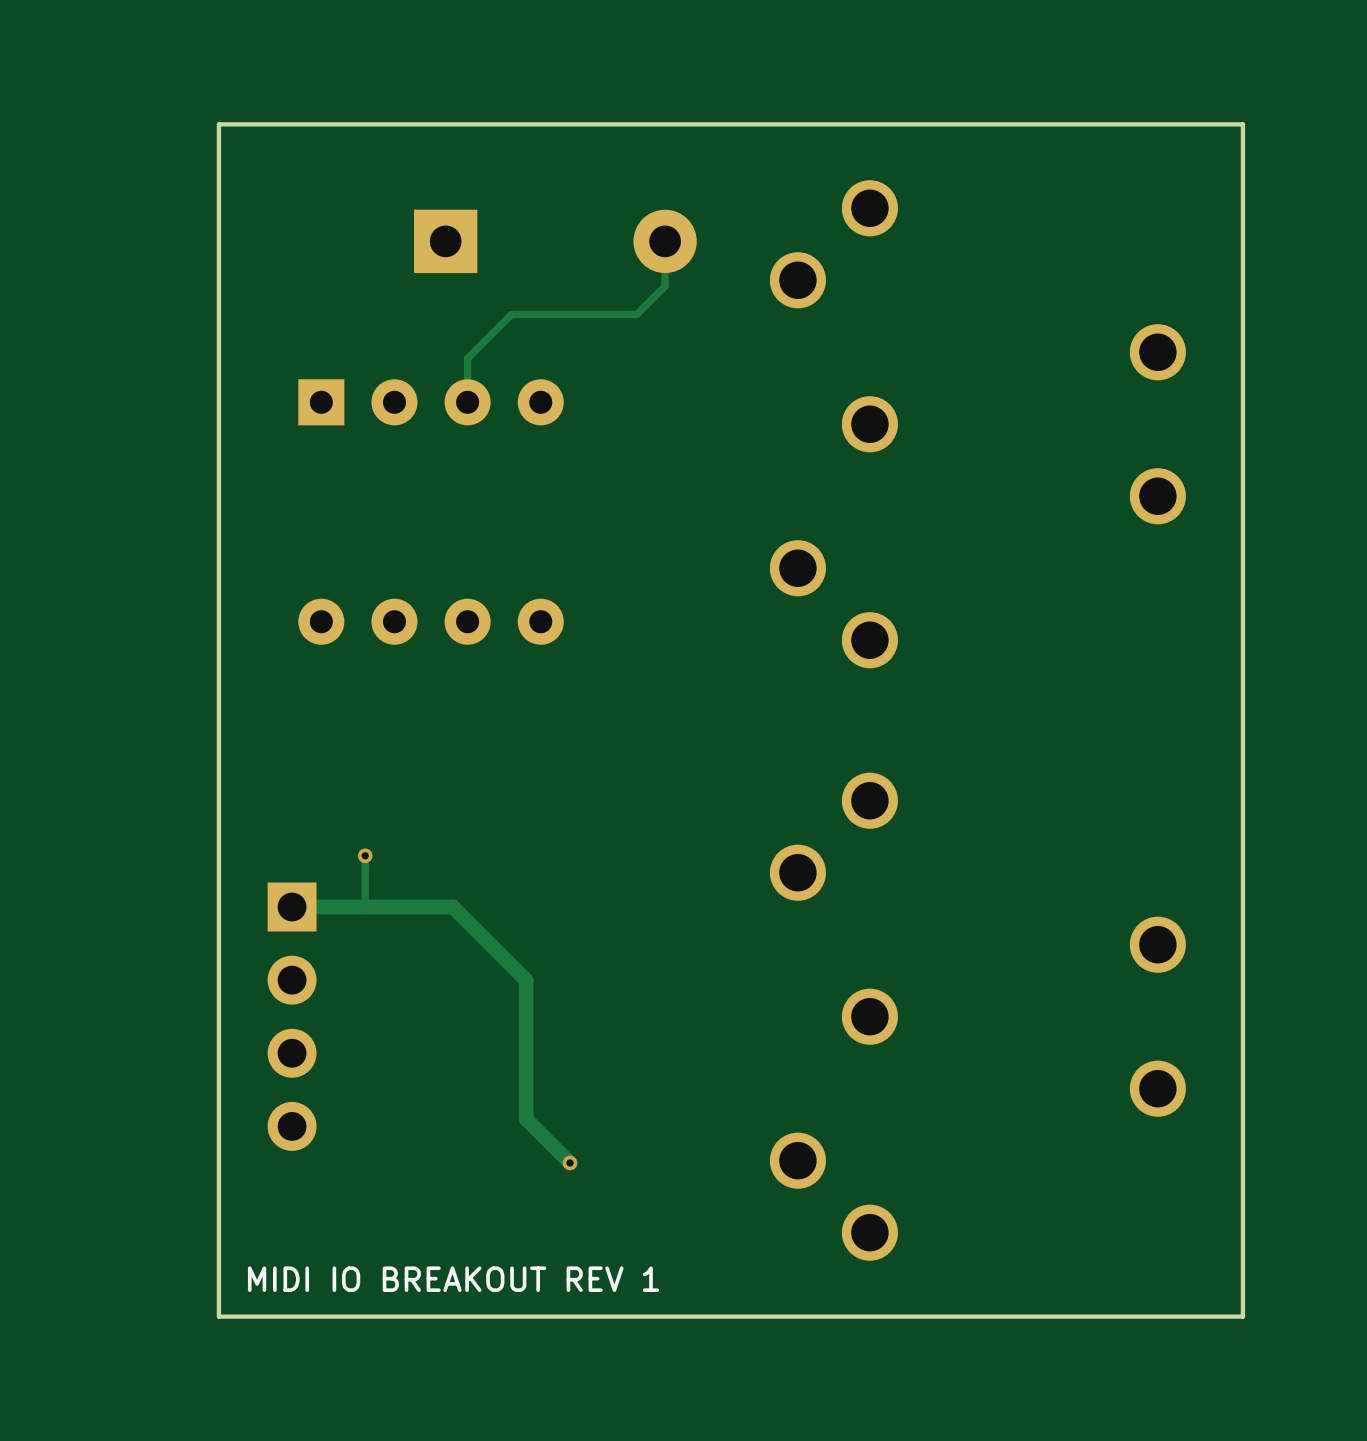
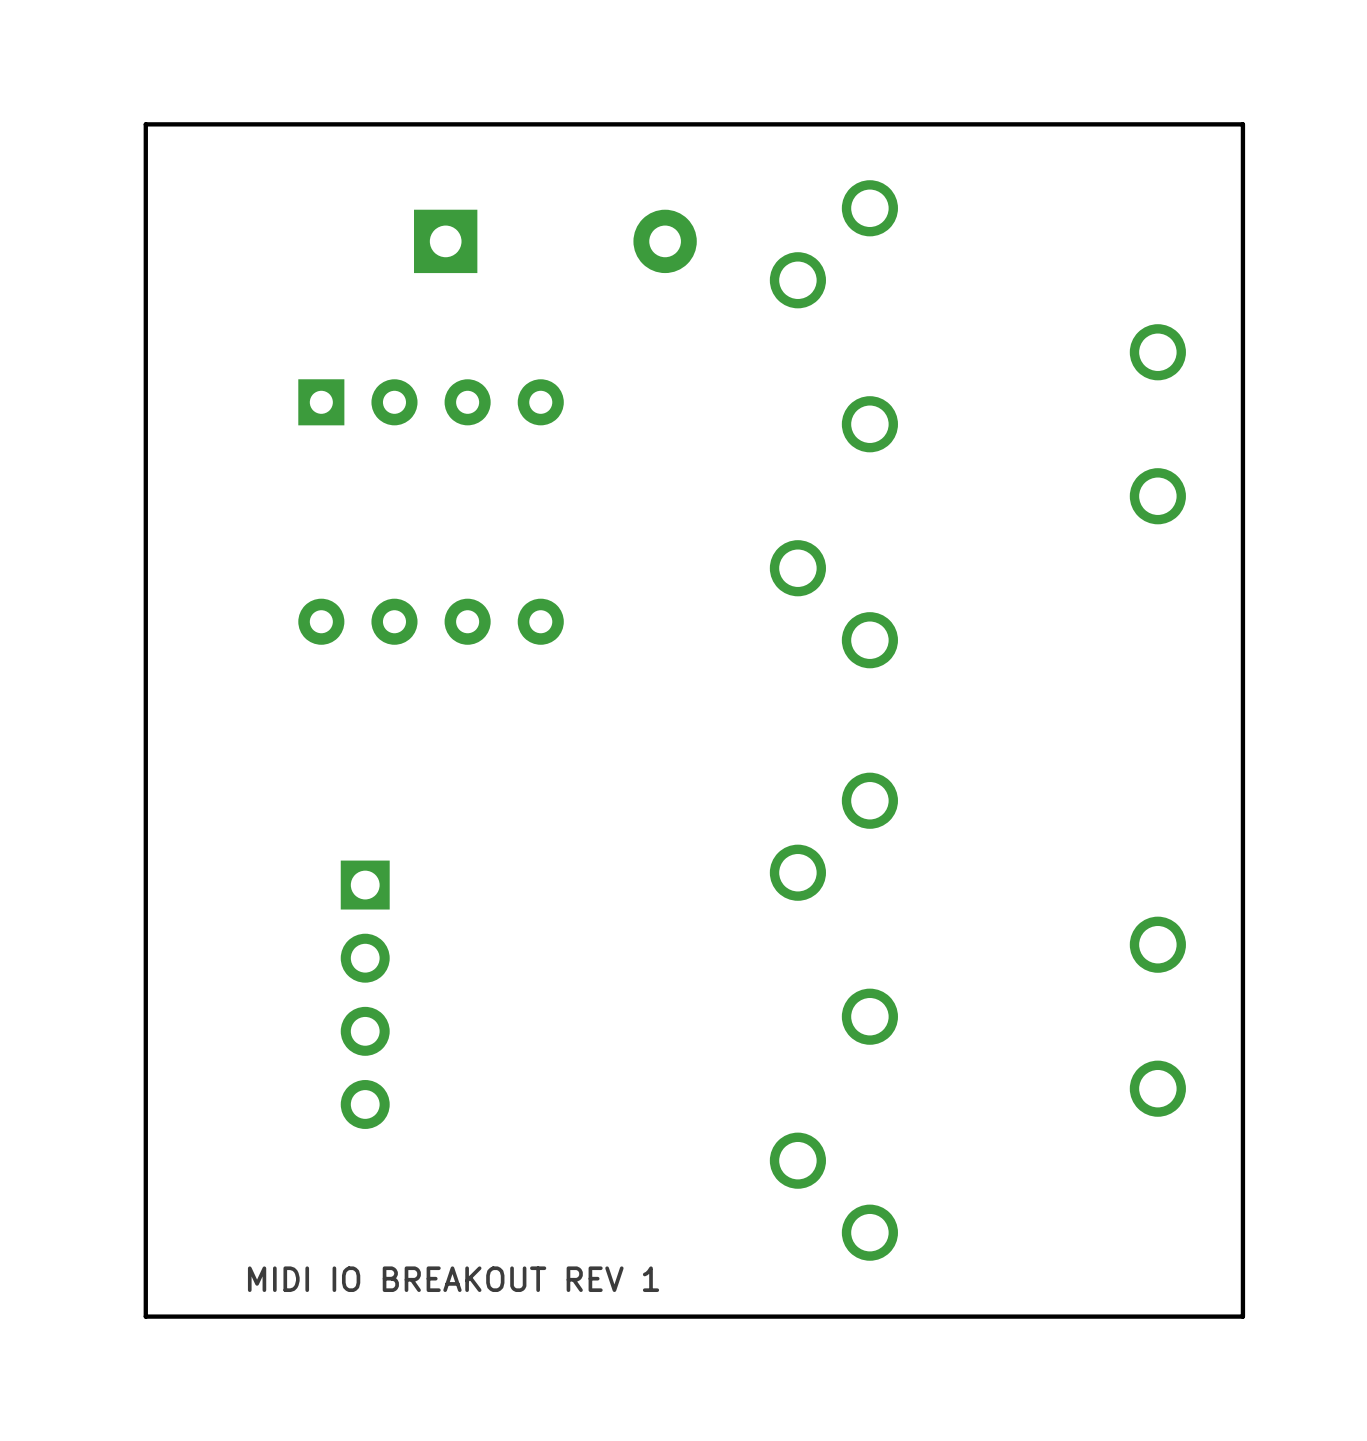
board edge: (218, 124) (218, 1316) -> (218, 124) (145, 124) (145, 1316) (218, 1316)
track: (665, 241) (665, 286) (636, 314) (511, 314) (467, 358) (467, 402) -> none
track: (365, 855) (365, 906) -> none
via: (365, 855) -> none
track: (292, 906) (452, 906) (526, 980) (526, 1119) (570, 1162) -> none
part position: (292, 1016) -> (365, 994)
via: (570, 1162) -> none

